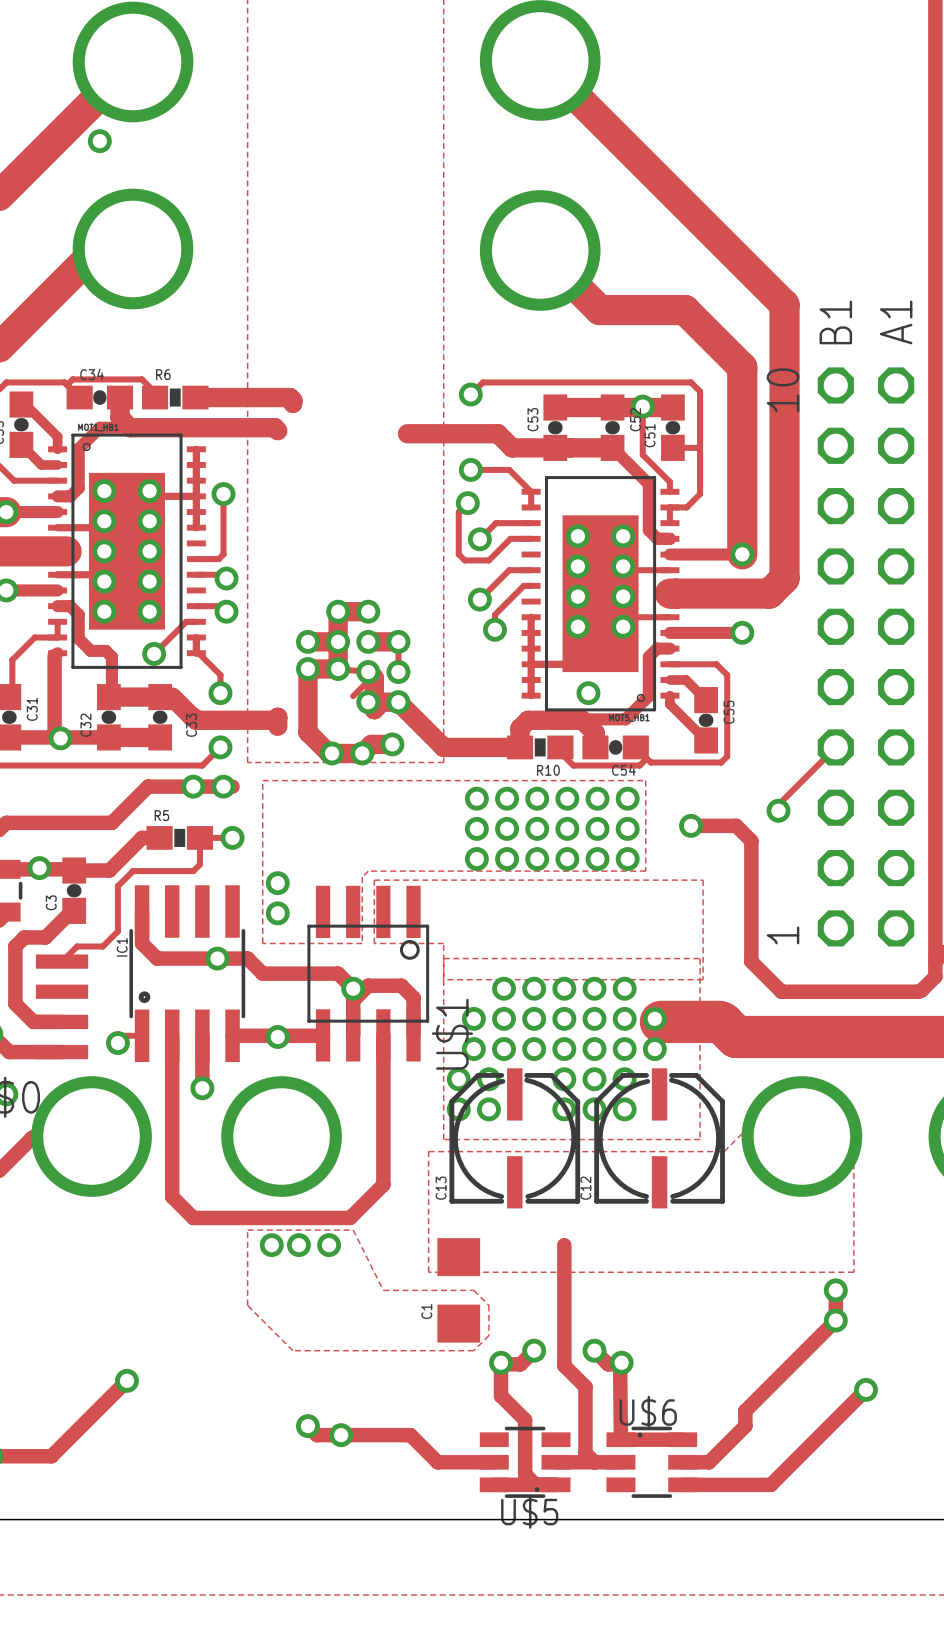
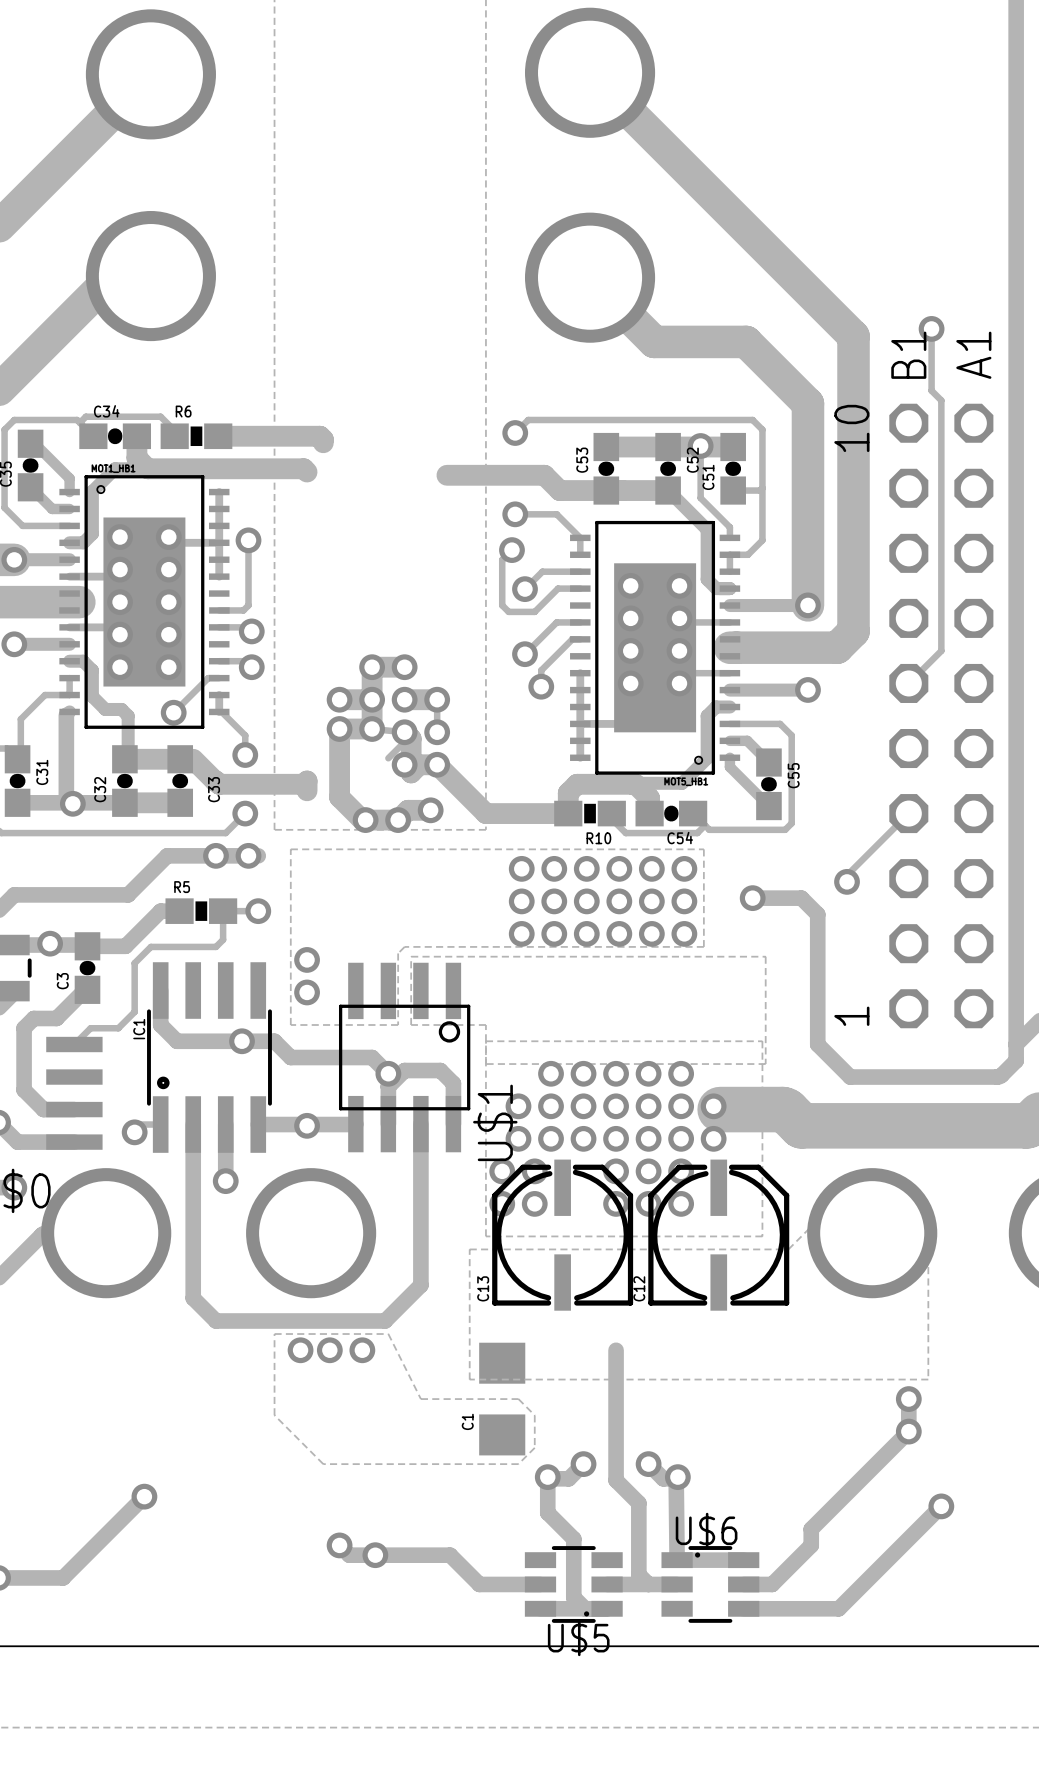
via: (99, 141) -> none
track: none -> (931, 328) (931, 390) (941, 400) (941, 650) (908, 683)
via: none -> (931, 328)
via: (588, 693) -> none

